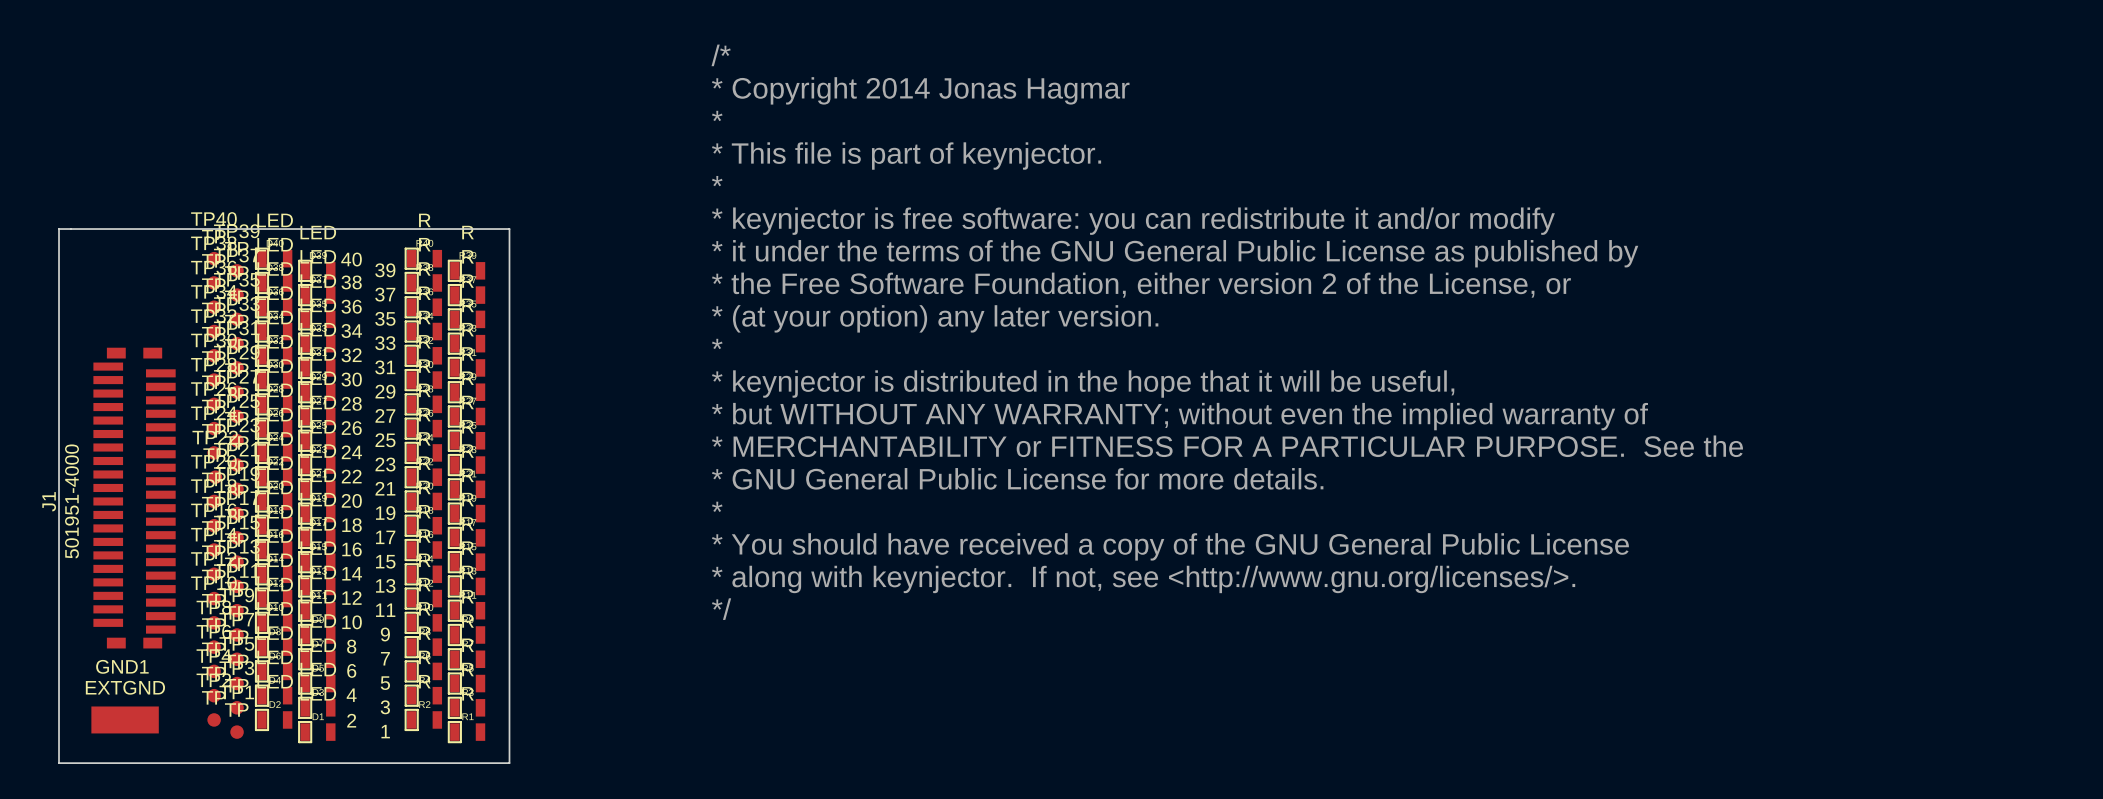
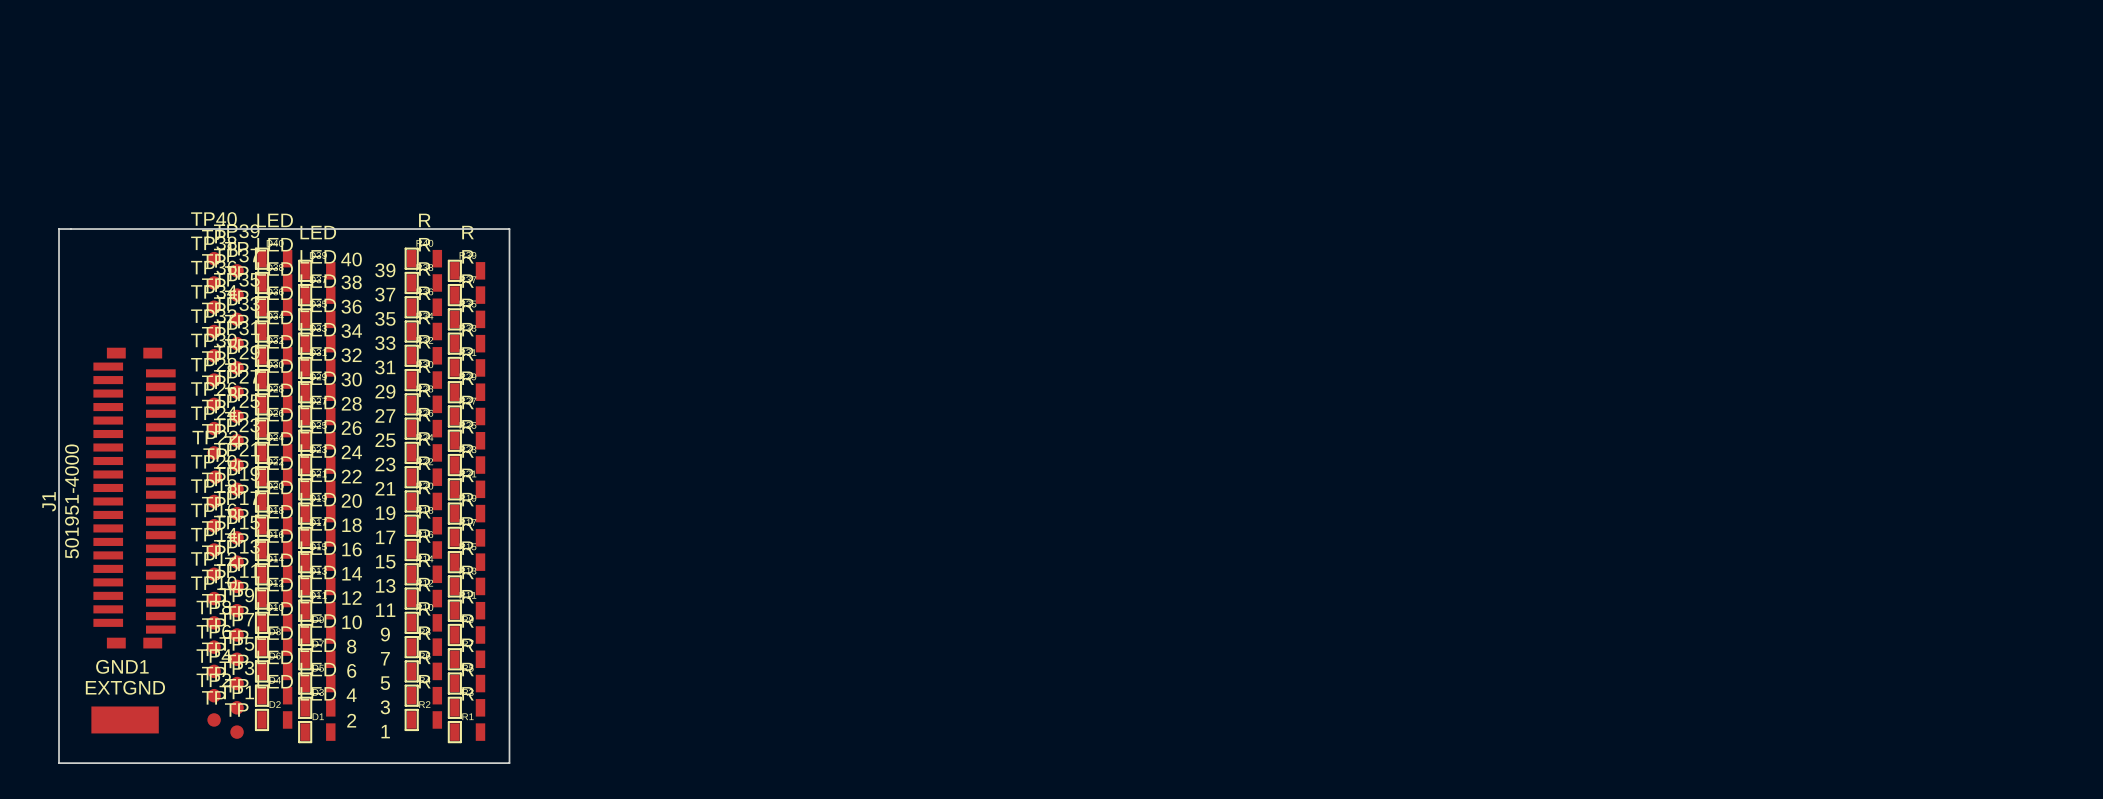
text: /* (721, 55) -> none
text: * Copyright 2014 Jonas Hagmar (920, 90) -> none
text: * (717, 115) -> none
text: * This file is part of keynjector. (906, 156) -> none
text: * (717, 181) -> none
text: * keynjector is free software: you can redistribute it and/or modify (1133, 221) -> none
text: * it under the terms of the GNU General Public License as published by (1175, 253) -> none
text: * the Free Software Foundation, either version 2 of the License, or (1141, 285) -> none
text: * (at your option) any later version. (935, 318) -> none
text: * (717, 343) -> none
text: * keynjector is distributed in the hope that it will be useful, (1083, 384) -> none
text: * but WITHOUT ANY WARRANTY; without even the implied warranty of (1179, 416) -> none
text: * MERCHANTABILITY or FITNESS FOR A PARTICULAR PURPOSE. See the (1227, 446) -> none
text: * GNU General Public License for more details. (1017, 478) -> none
text: * (717, 506) -> none
text: * You should have received a copy of the GNU General Public License (1170, 546) -> none
text: * along with keynjector. If not, see <http://www.gnu.org/licenses/>. (1143, 579) -> none
text: */ (721, 609) -> none

